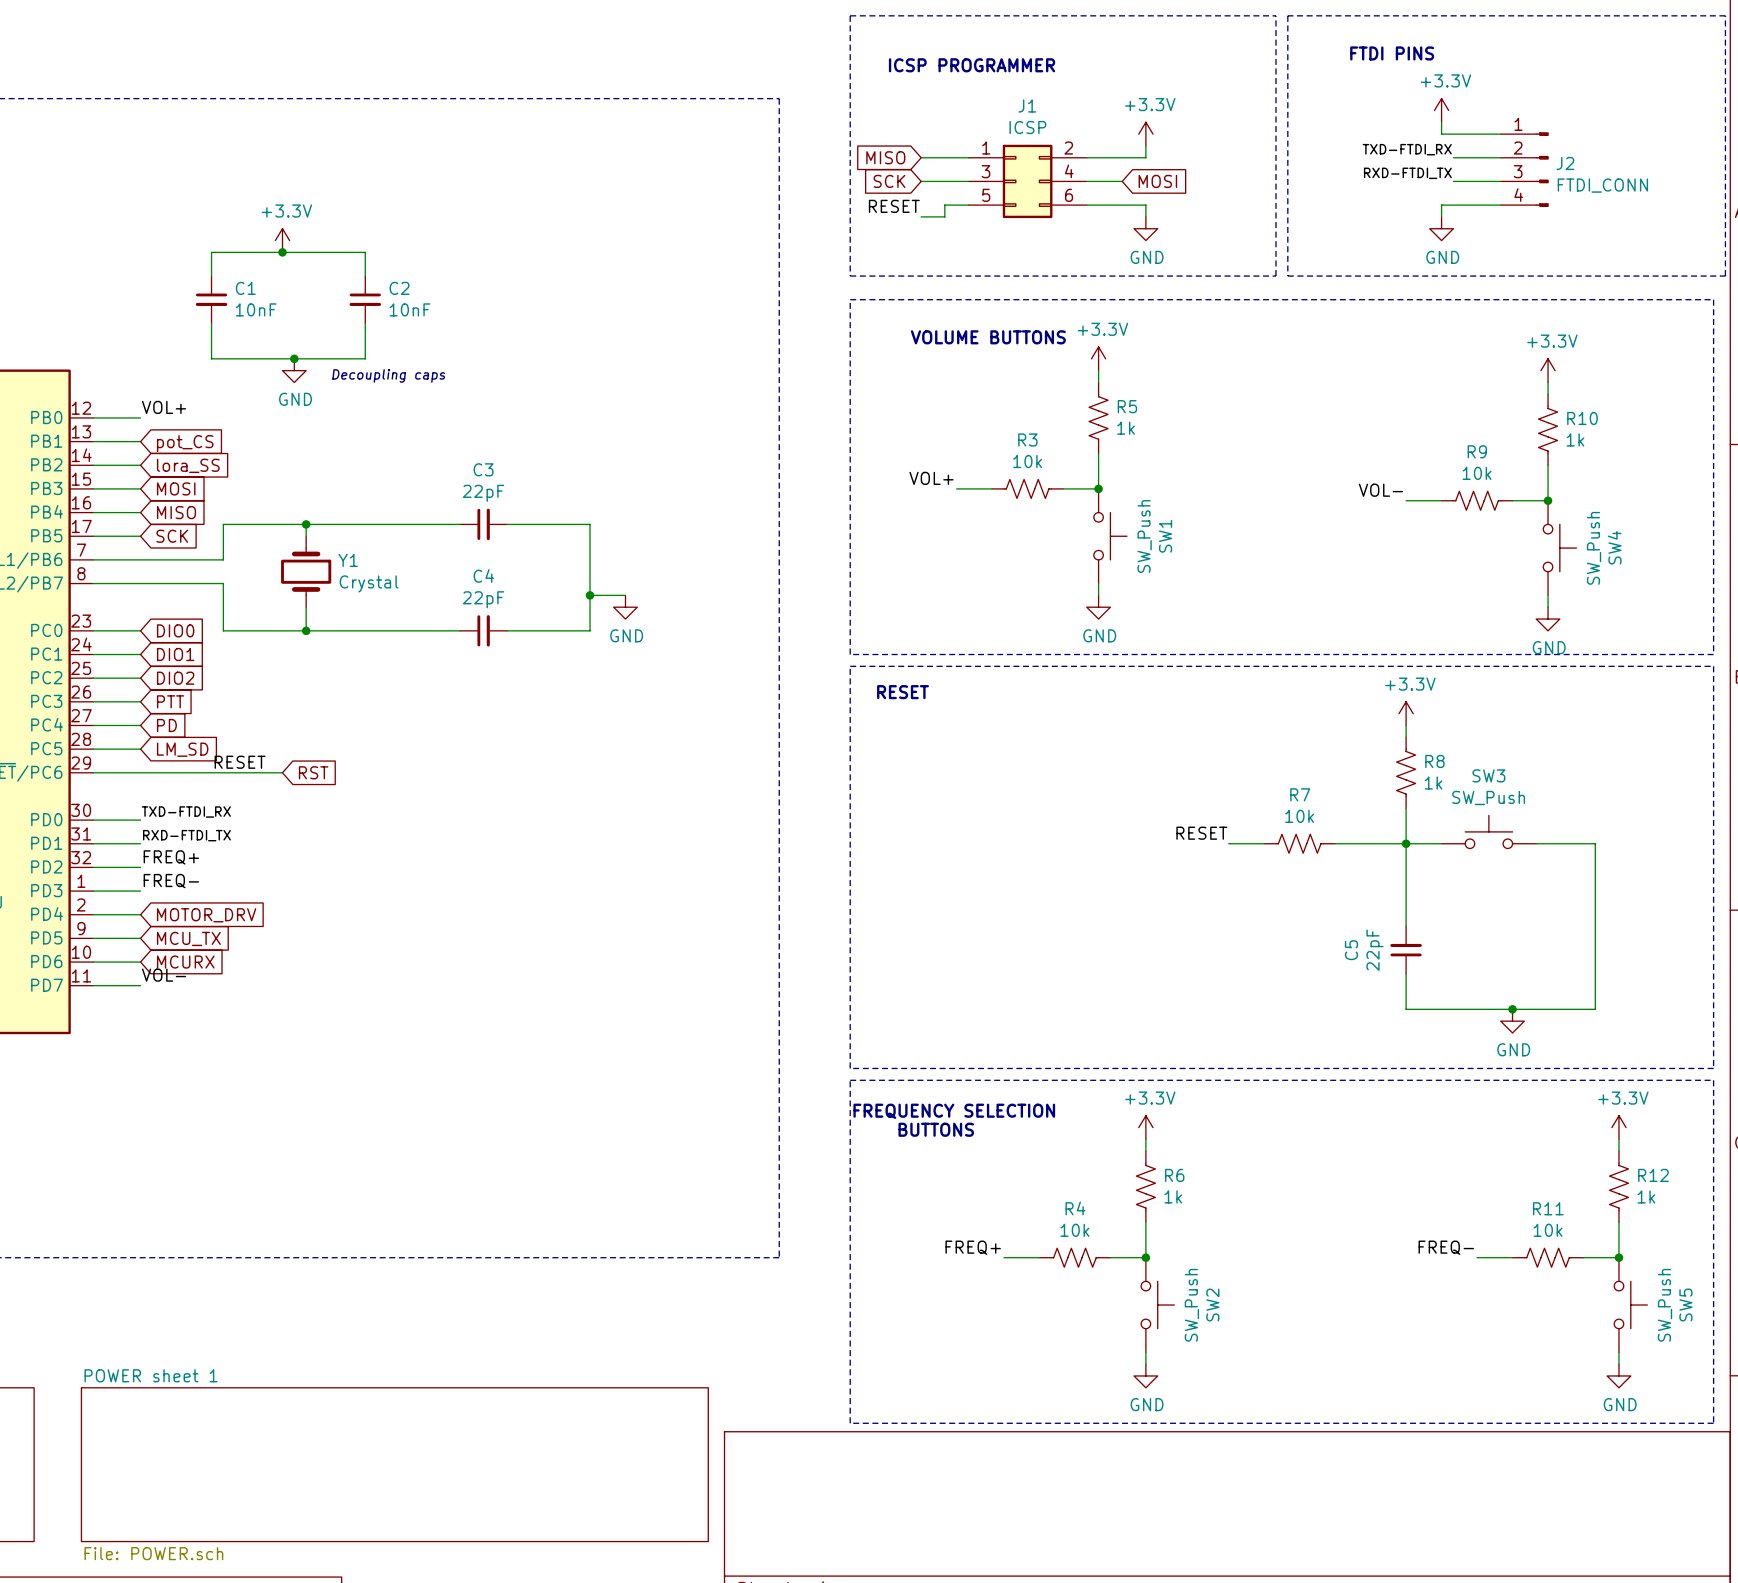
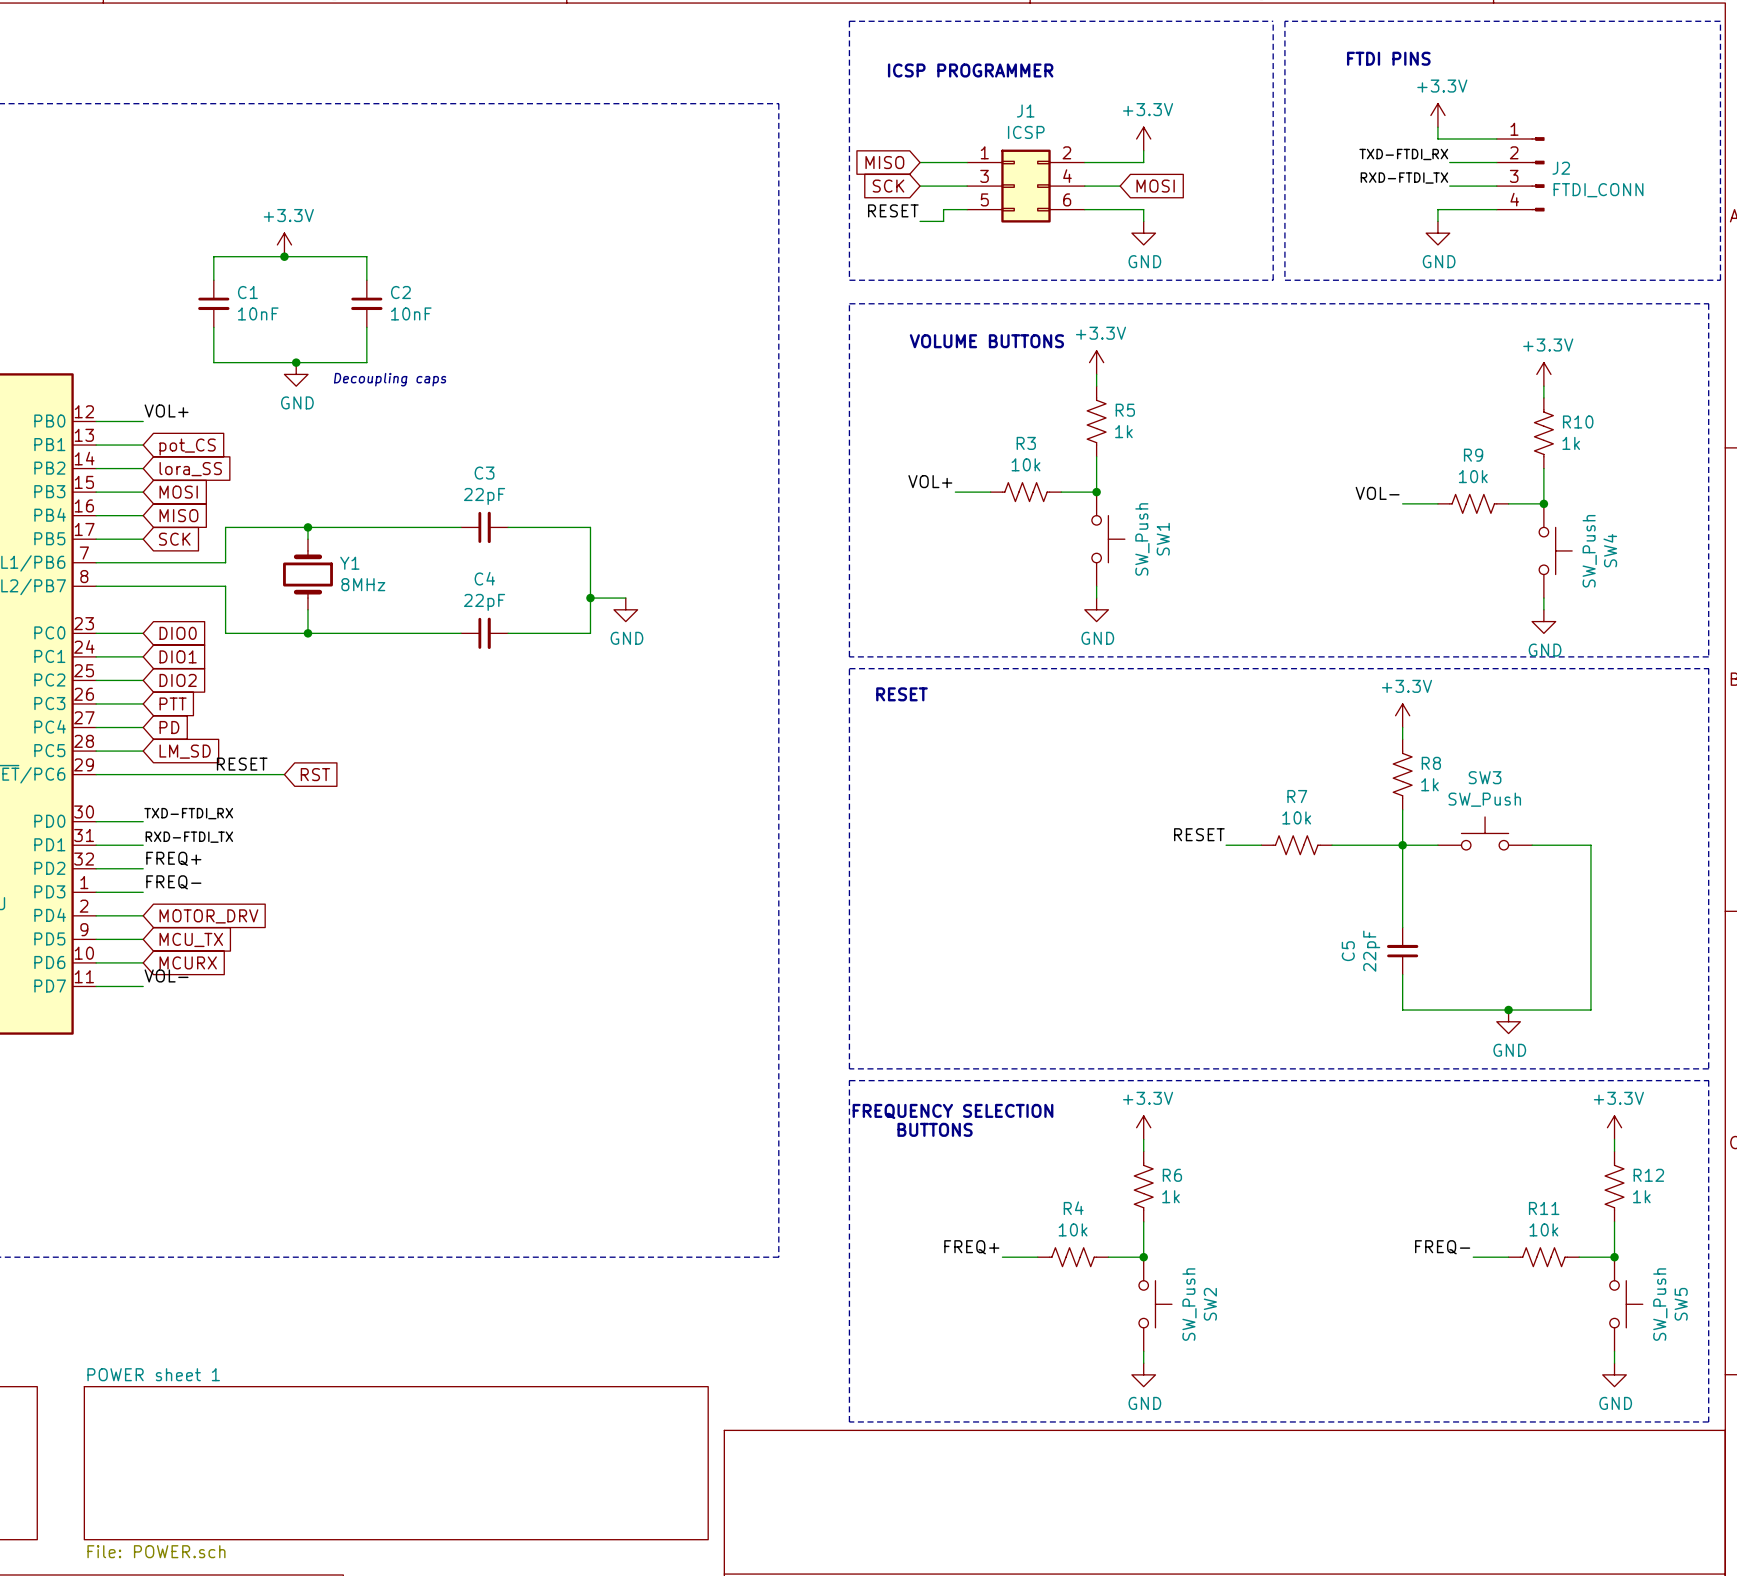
Y1 value: Crystal (369, 583) -> 8MHz (363, 584)

